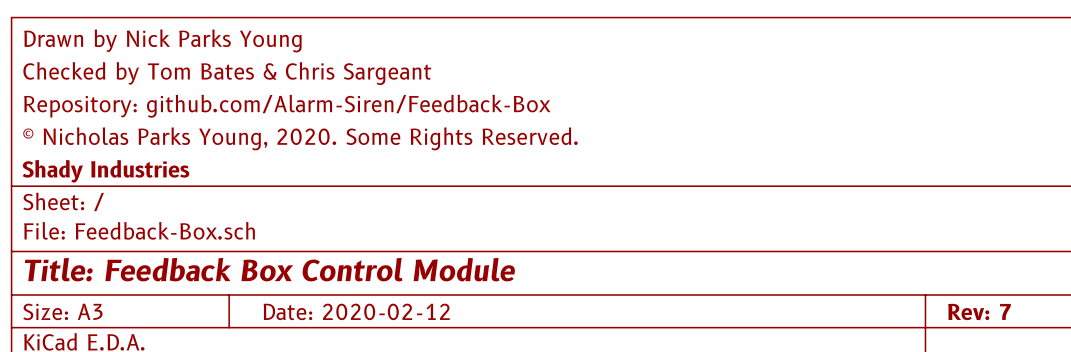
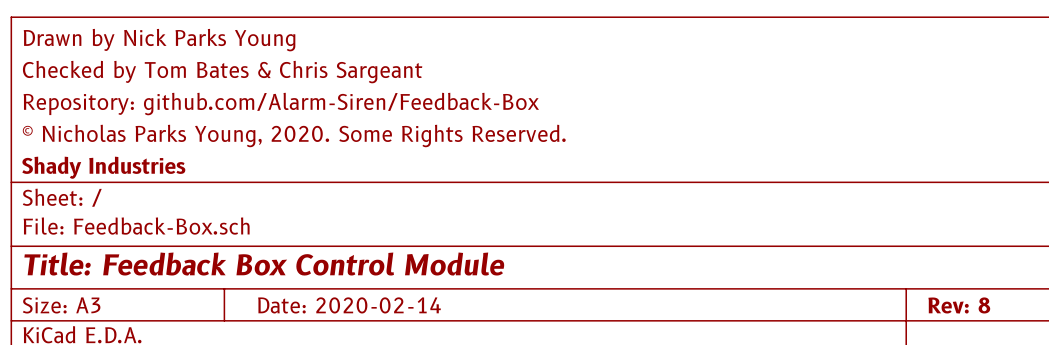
title block: Date: 2020-02-12 (356, 311) -> Date: 2020-02-14 (349, 305)
title block: Rev: 7 (979, 312) -> Rev: 8 (959, 305)

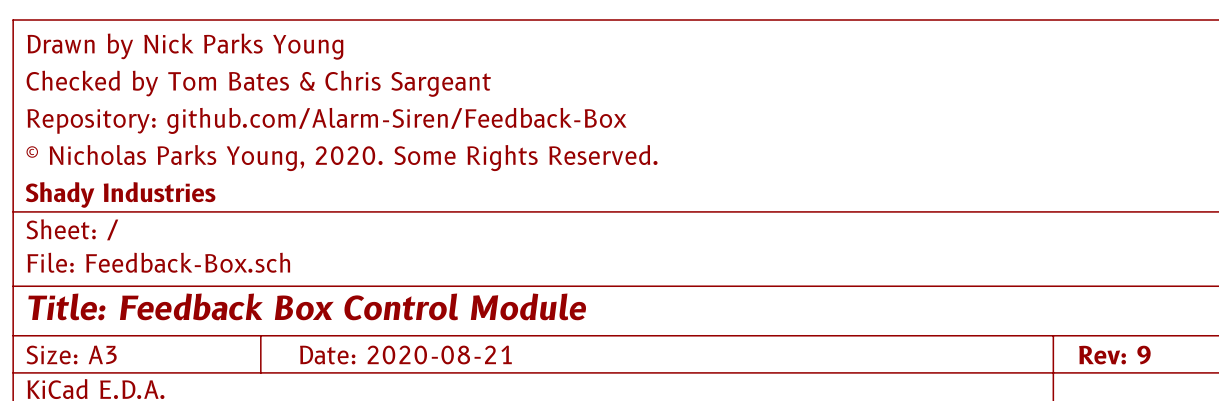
title block: Date: 2020-02-14 (349, 305) -> Date: 2020-08-21 (405, 354)
title block: Rev: 8 (959, 305) -> Rev: 9 (1114, 355)

